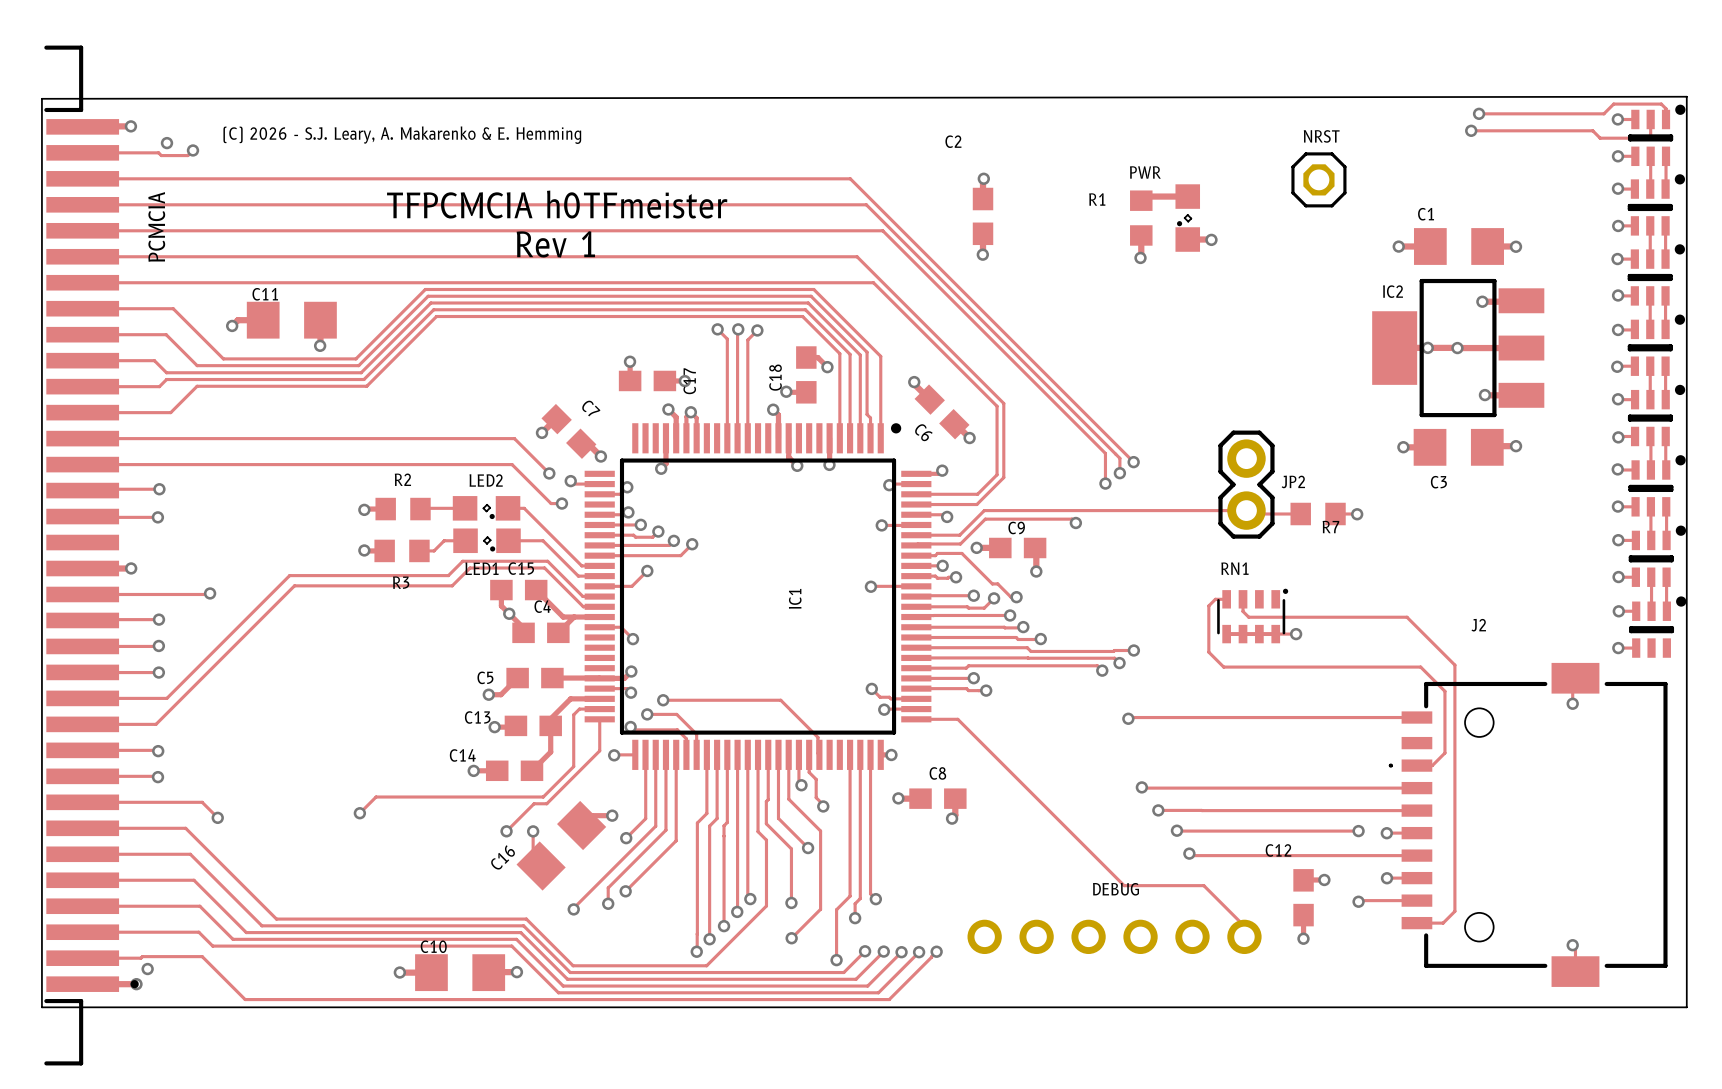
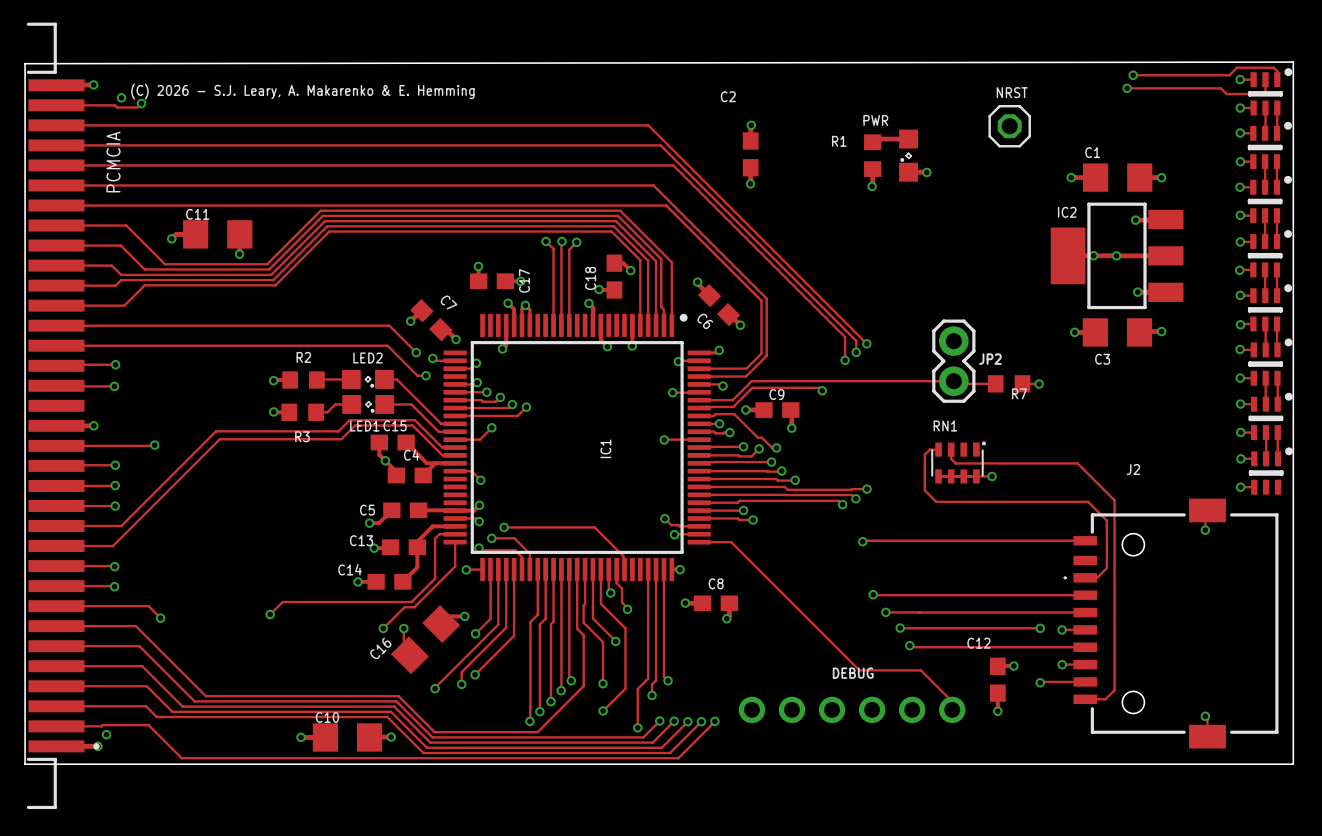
text: TFPCMCIA h0TFmeister (557, 204) -> none
text: Rev 1 (555, 244) -> none

